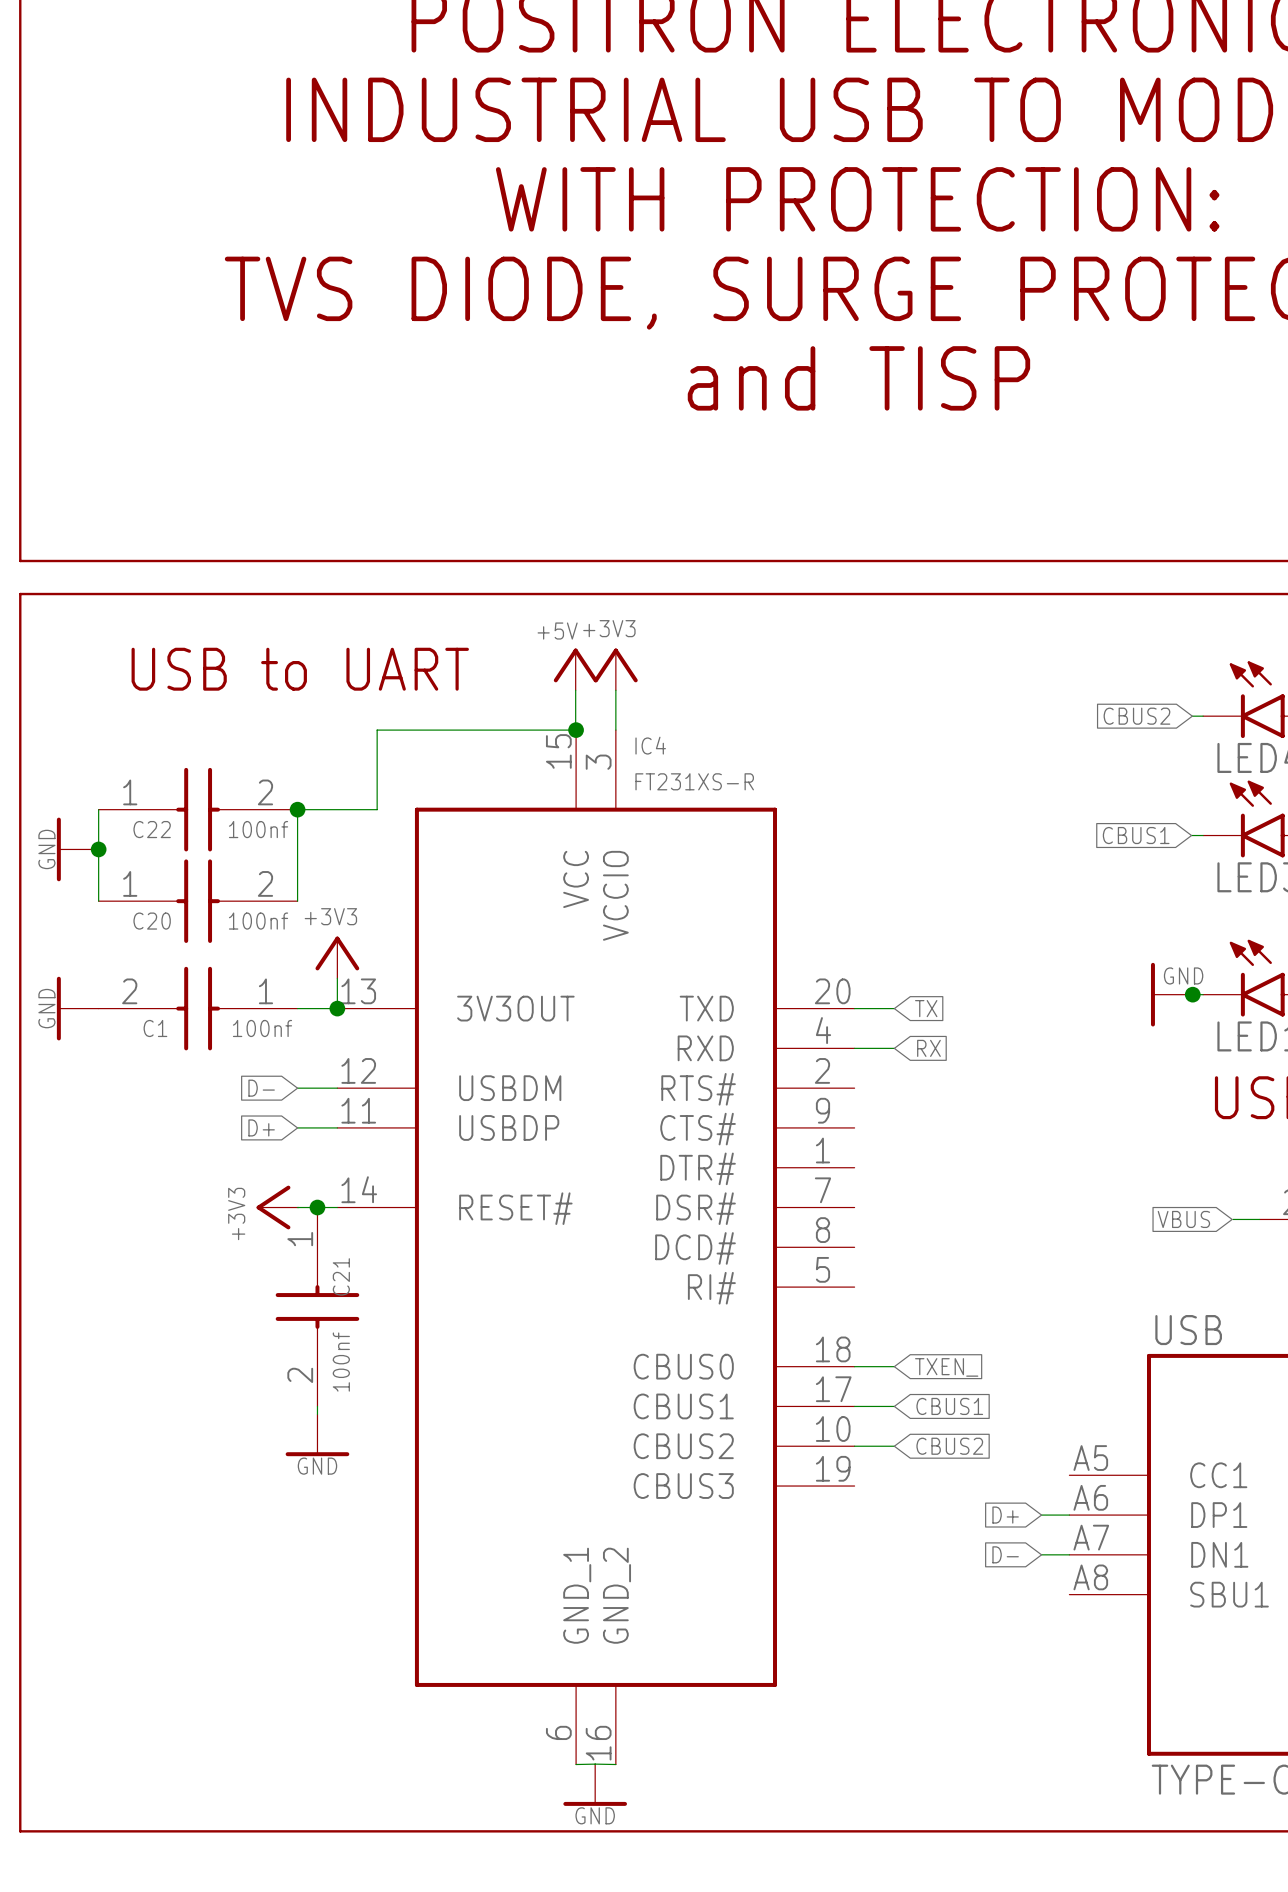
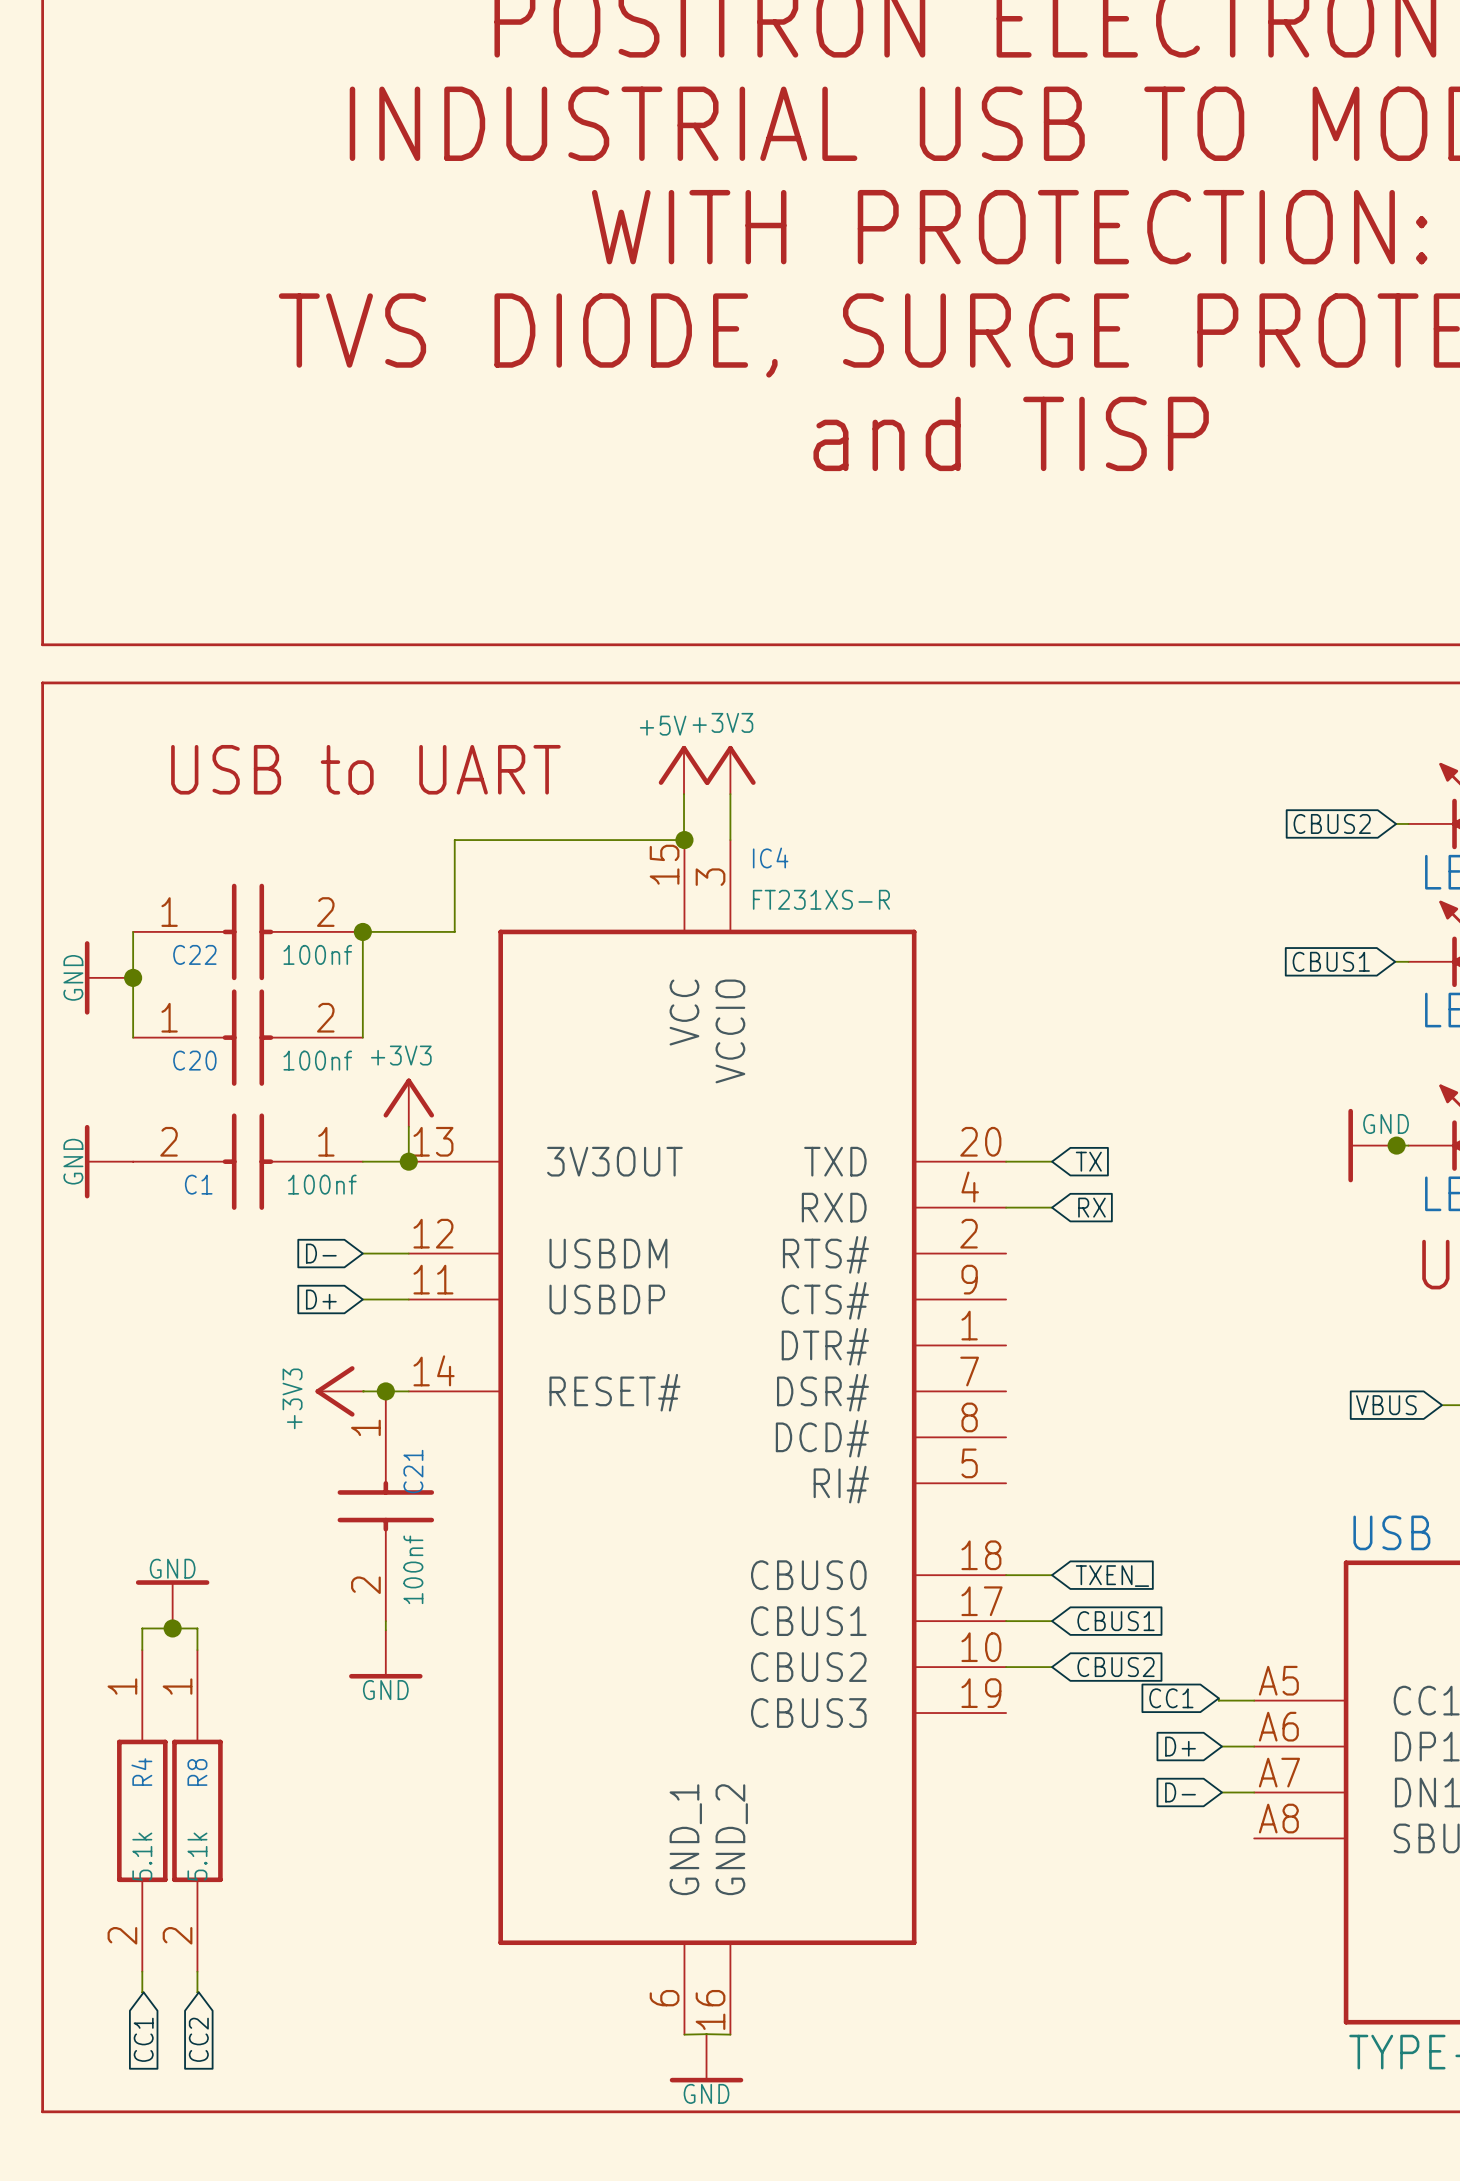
power symbol: none -> GND (172, 1604)
junction: none -> (172, 1628)
wire: none -> (142, 1650) (142, 1628) (197, 1628) (197, 1650)
global label: none -> CC1 (1171, 1698)
wire: none -> (1218, 1698) (1218, 1700) (1254, 1700)
R4: none -> 5.1k (142, 1810)
R8: none -> 5.1k (197, 1810)
wire: none -> (142, 1971) (143, 1992)
wire: none -> (197, 1971) (198, 1992)
global label: none -> CC1 (143, 2039)
global label: none -> CC2 (198, 2039)

